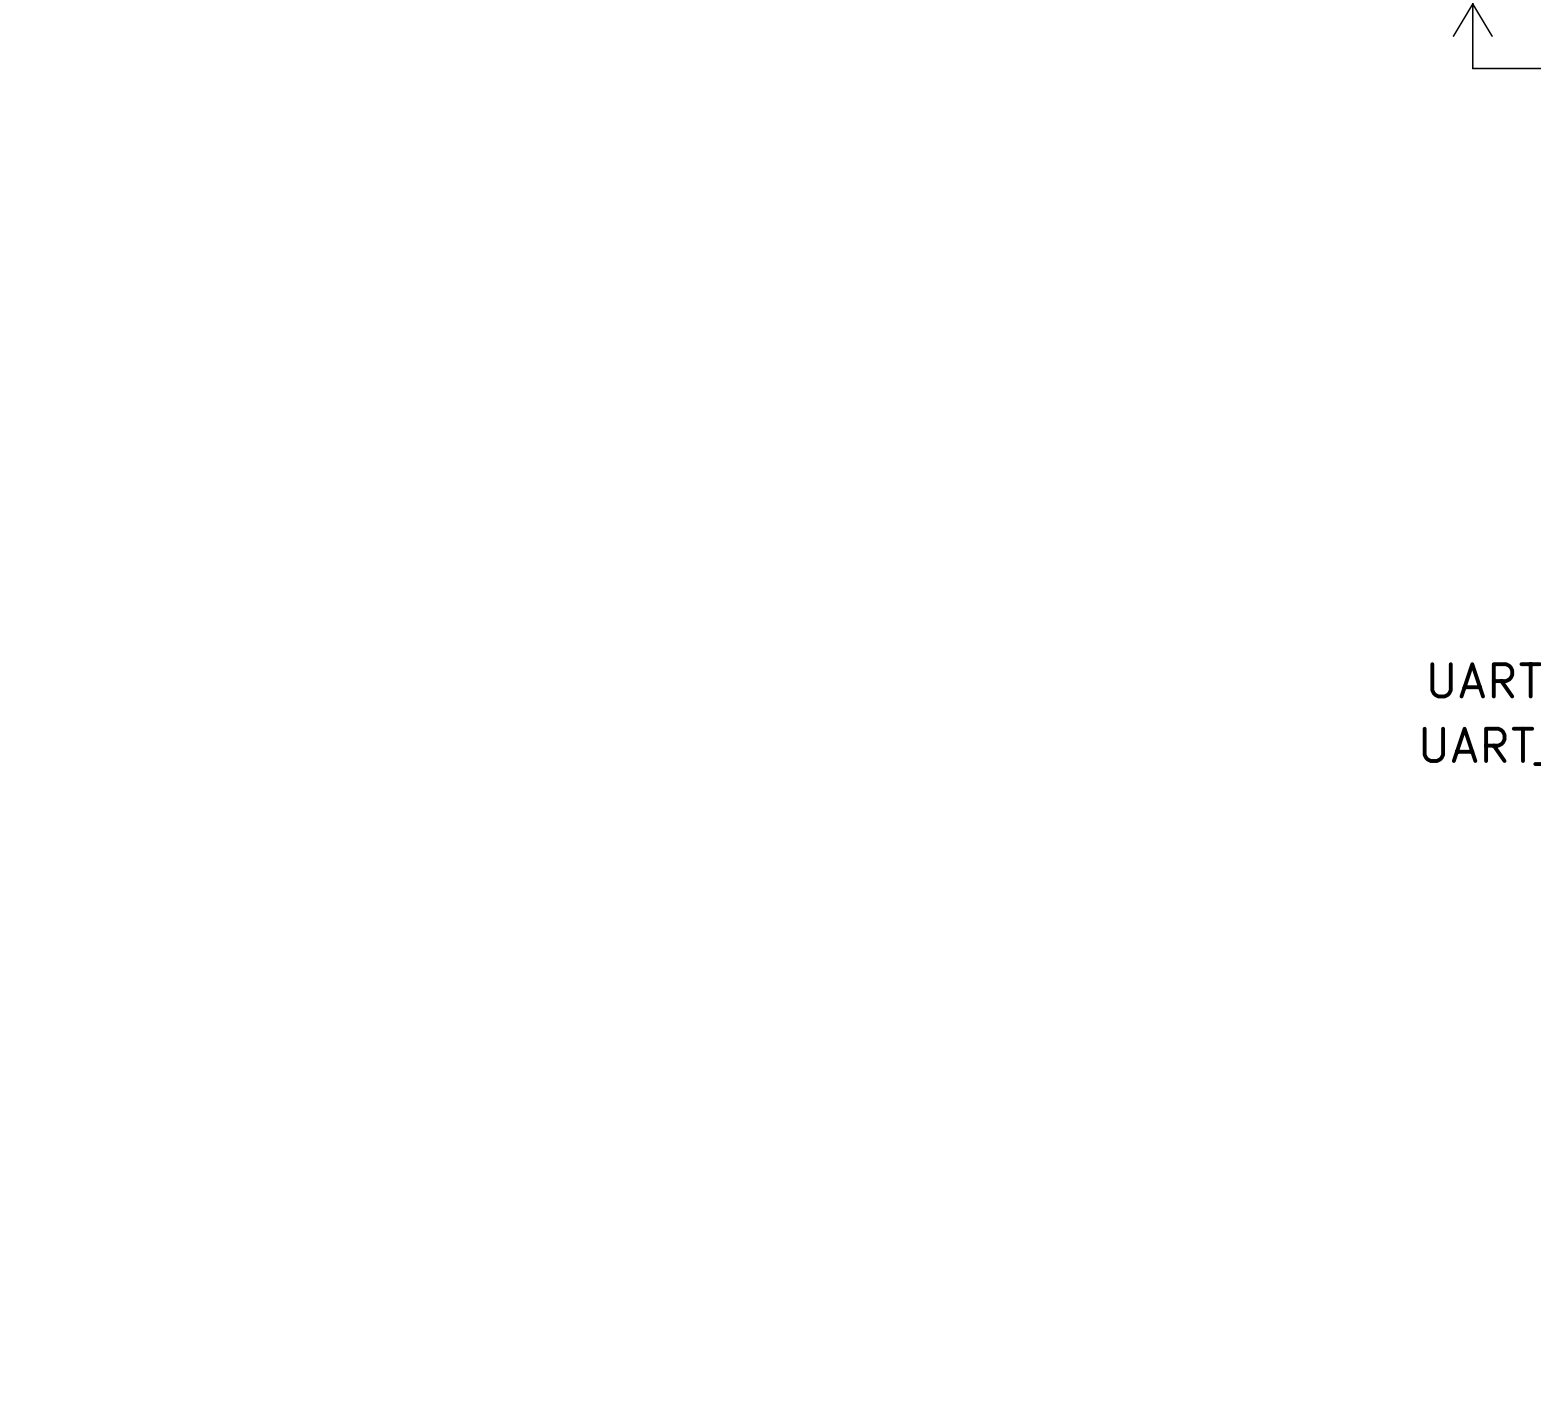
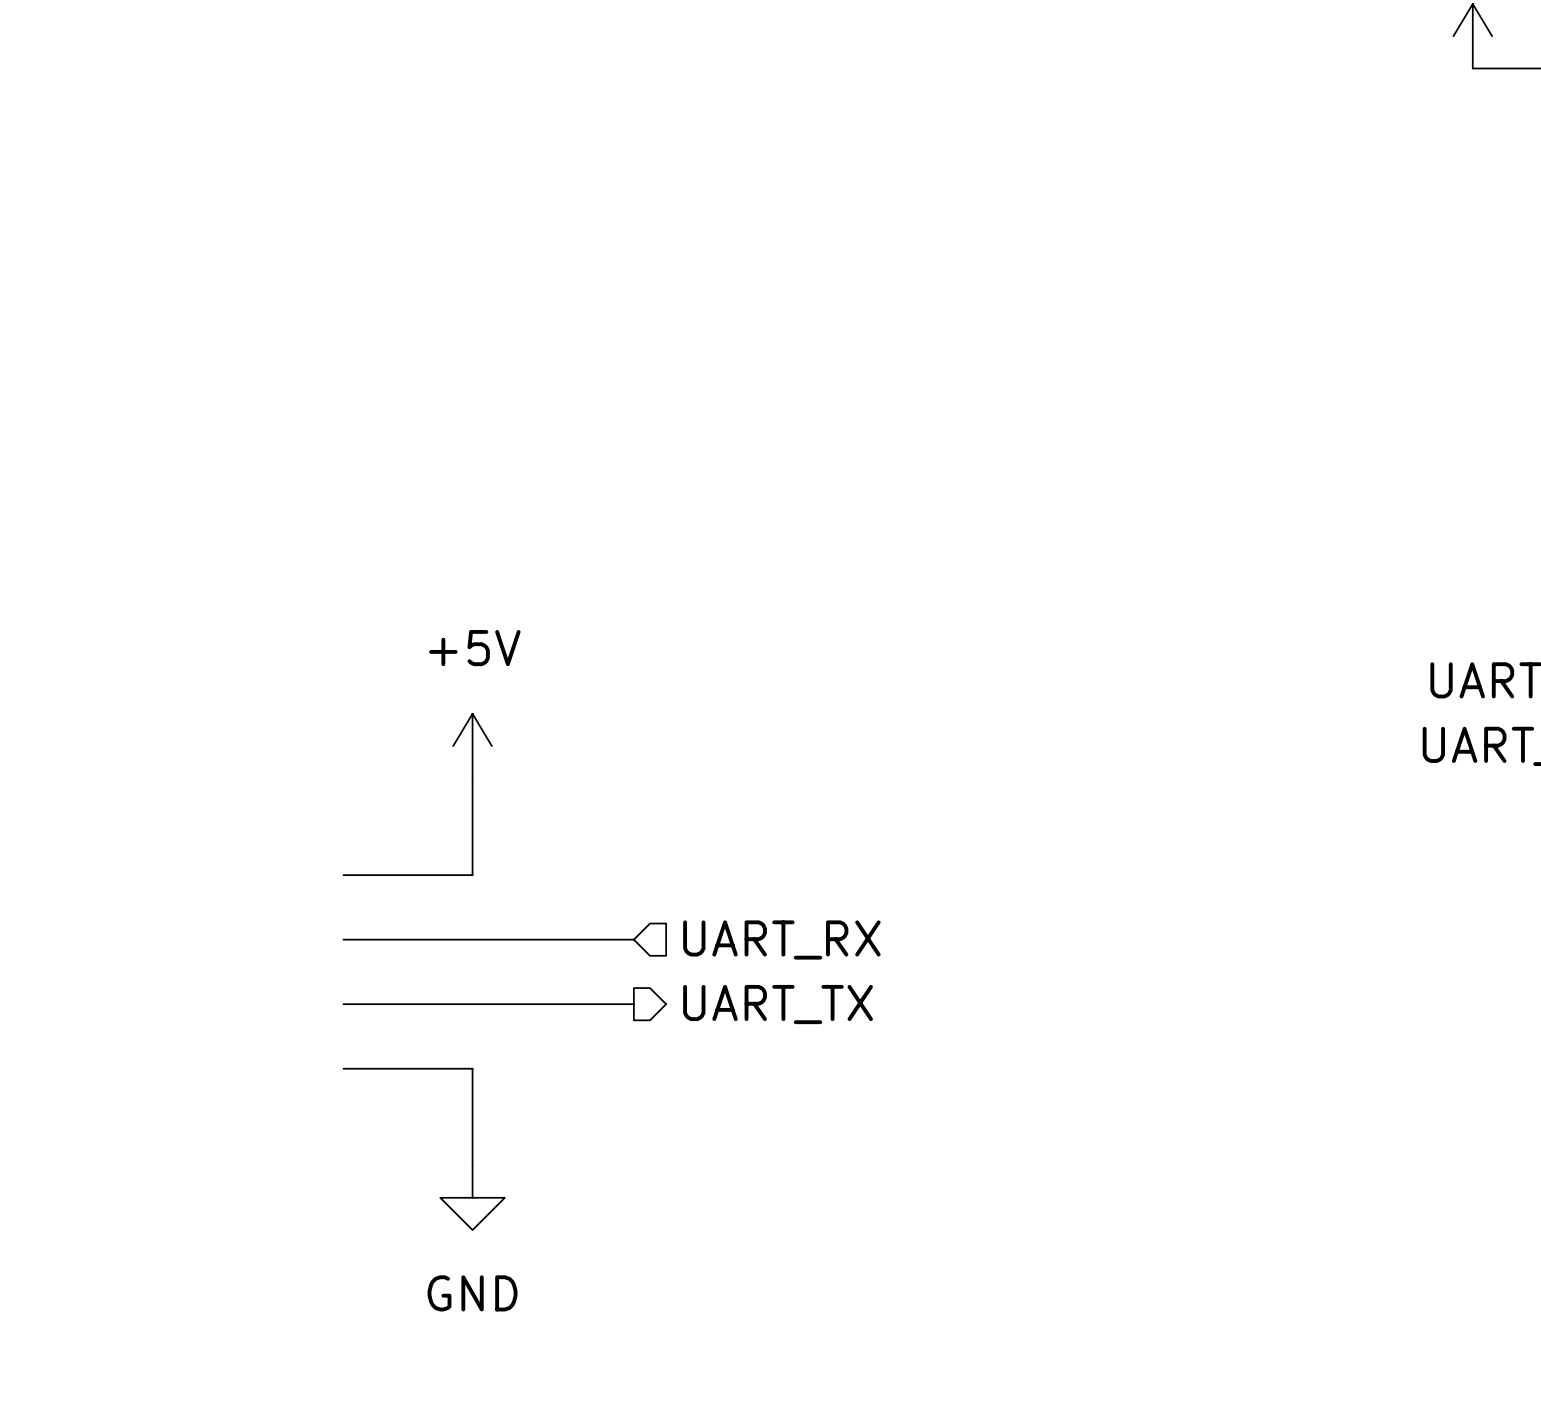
power symbol: none -> +5V (472, 746)
wire: none -> (472, 778) (472, 875) (343, 875)
wire: none -> (343, 939) (633, 939)
hierarchical label: none -> UART_RX (781, 939)
wire: none -> (343, 1004) (633, 1004)
hierarchical label: none -> UART_TX (778, 1004)
wire: none -> (343, 1068) (472, 1068) (472, 1165)
power symbol: none -> GND (472, 1197)

